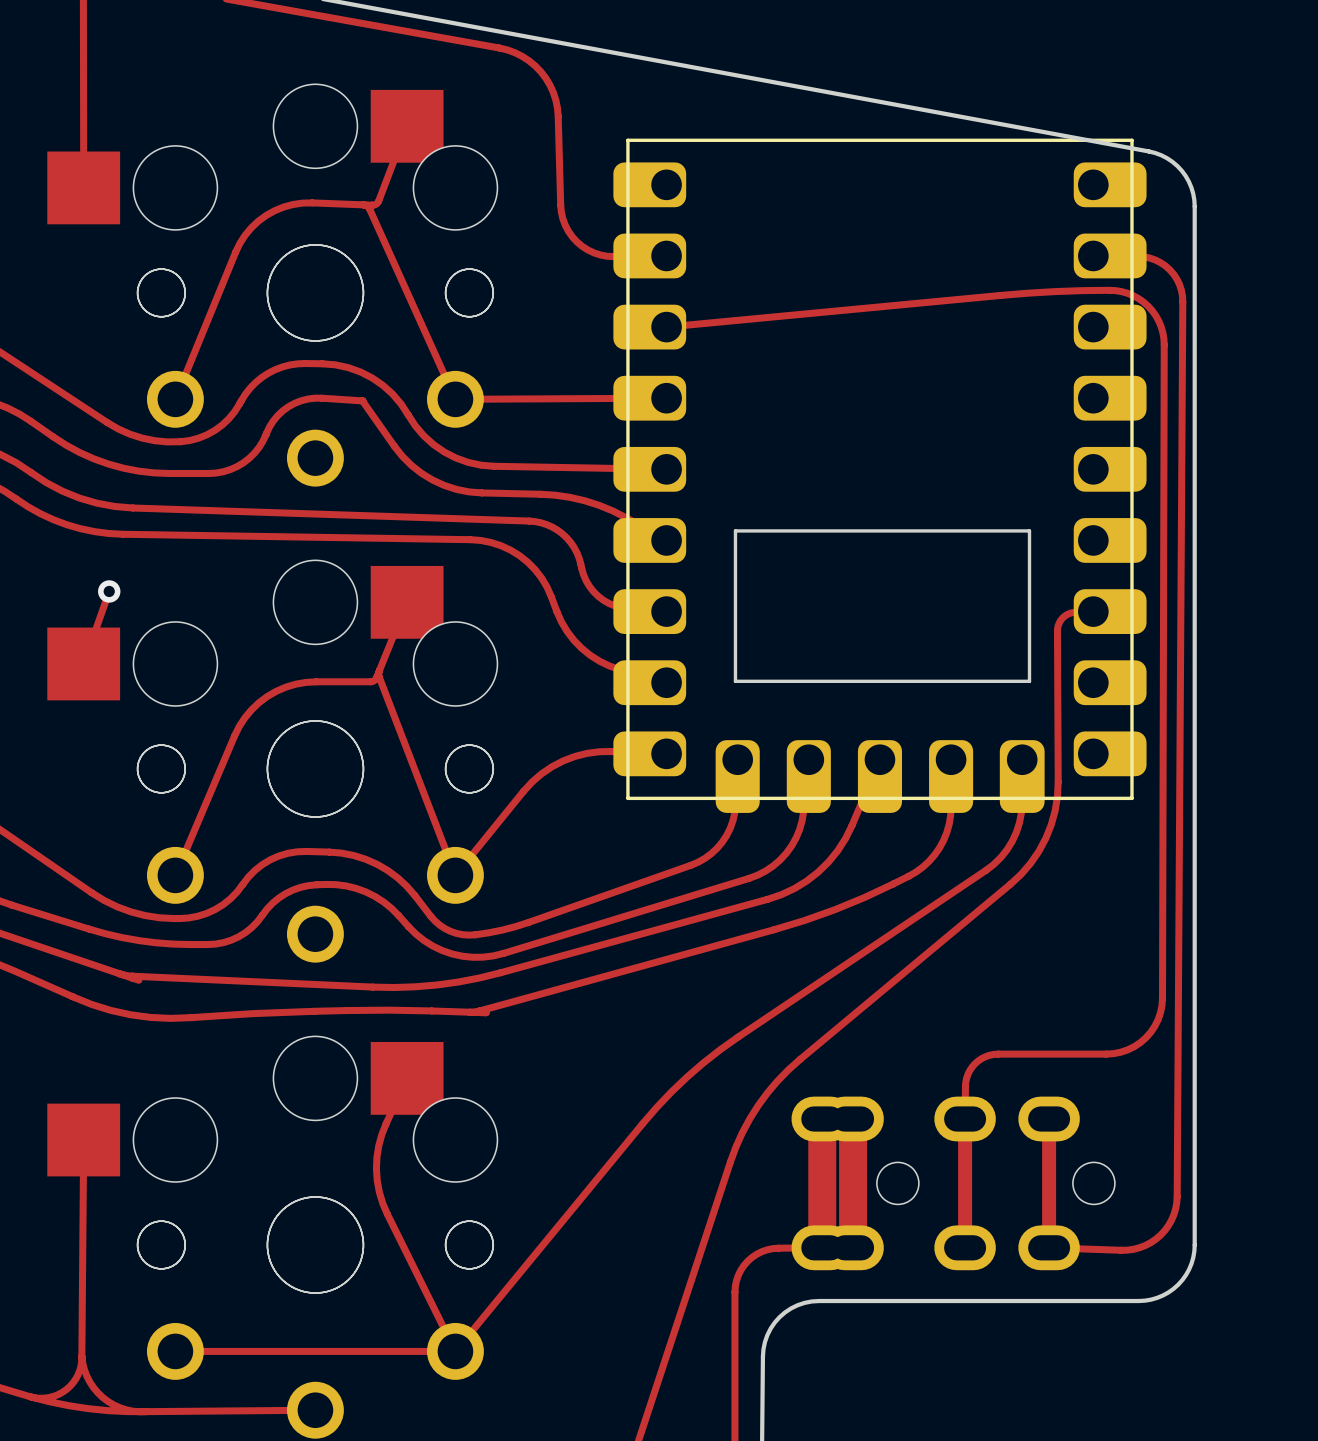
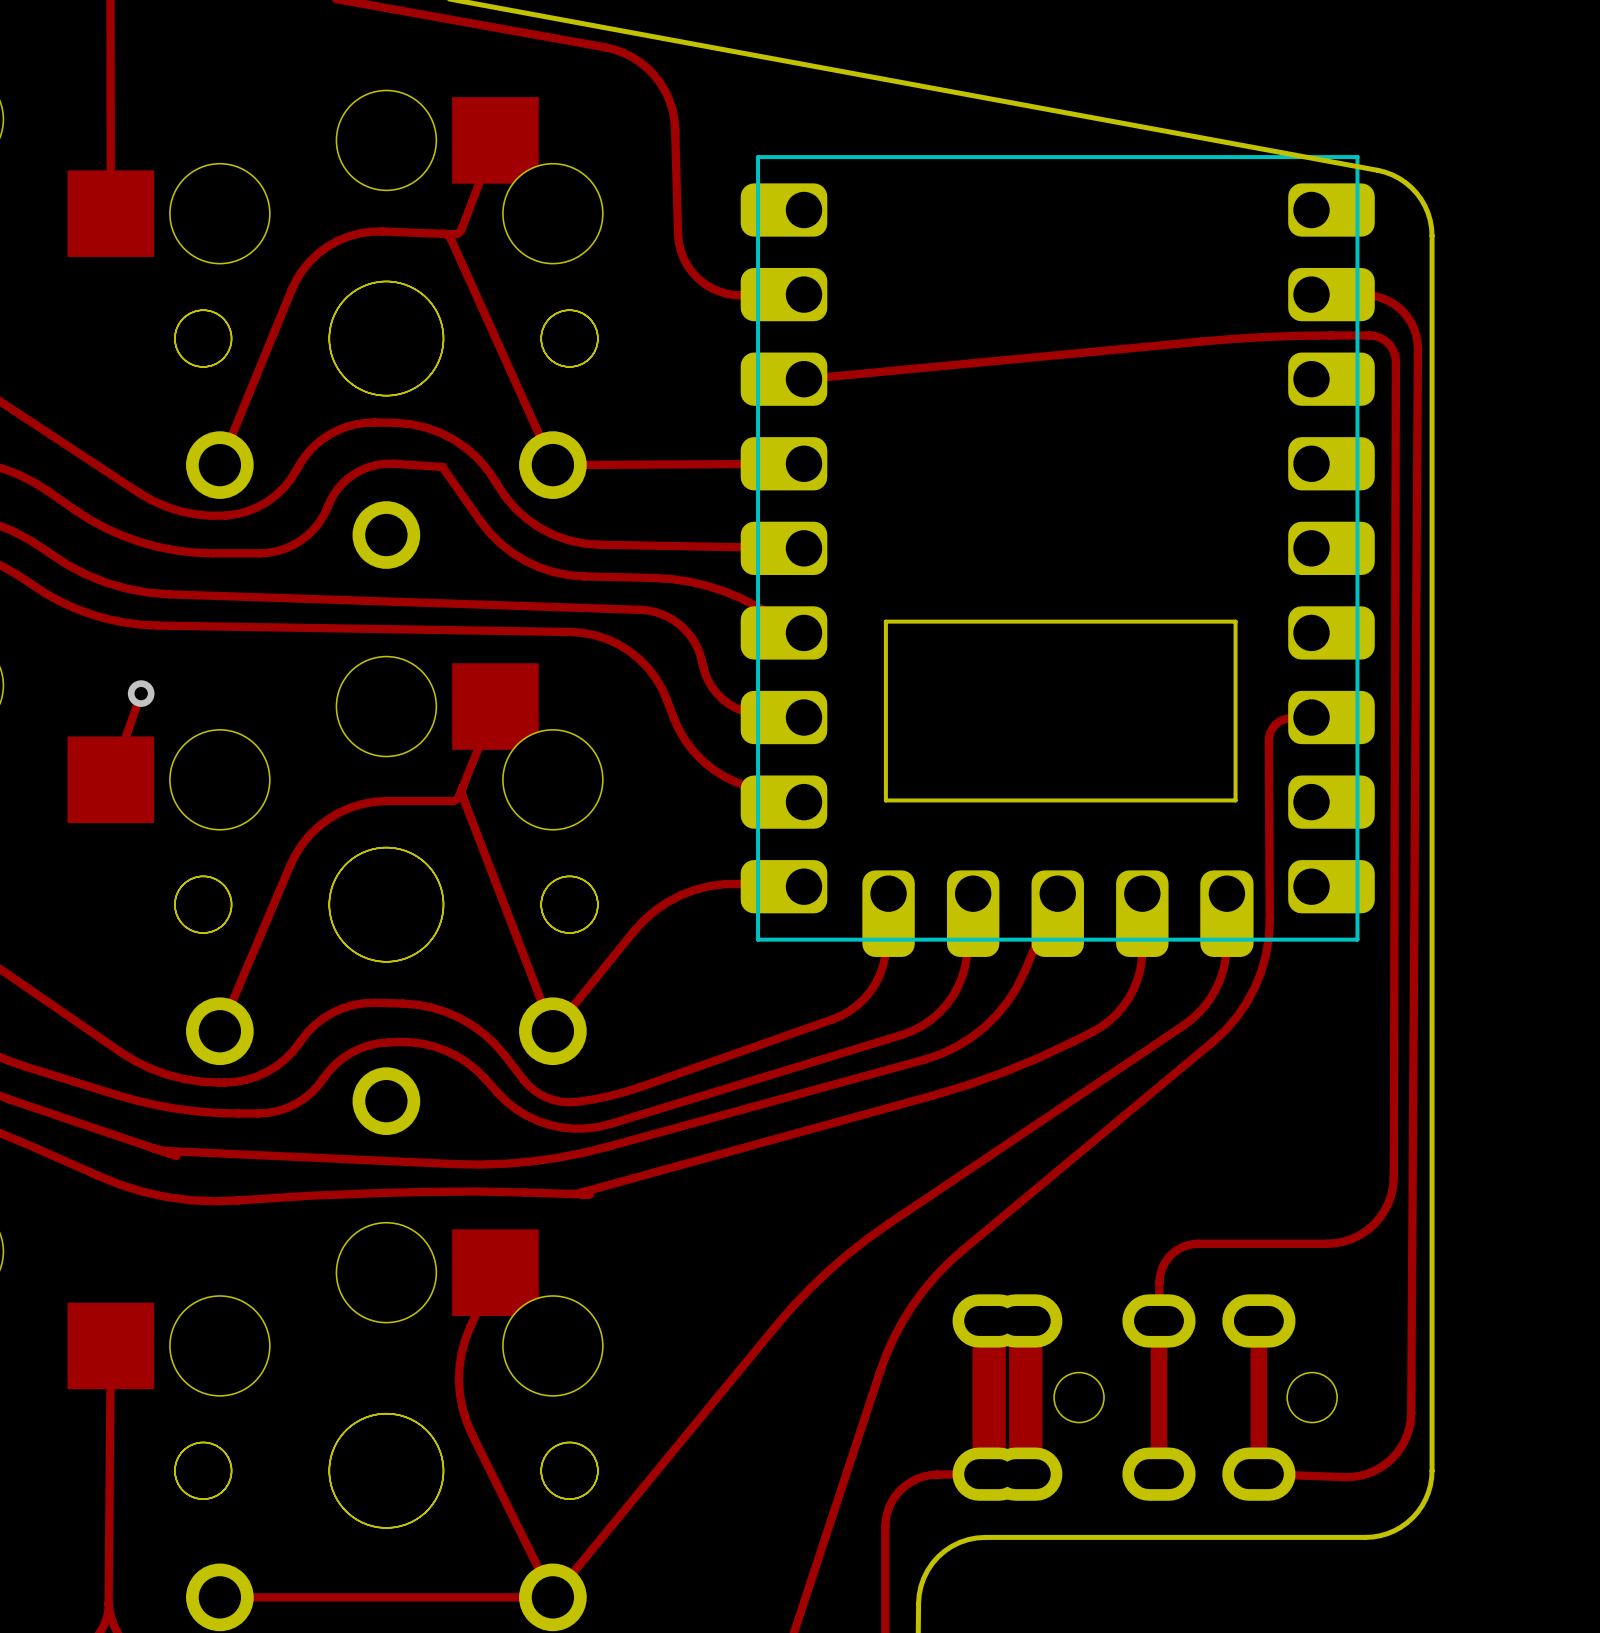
track: (1109, 290) (1127, 293) (1148, 306) (1158, 321) (1164, 345) -> (1330, 335) (1372, 335) (1380, 338) (1388, 343) (1393, 350) (1395, 359) (1395, 400)

